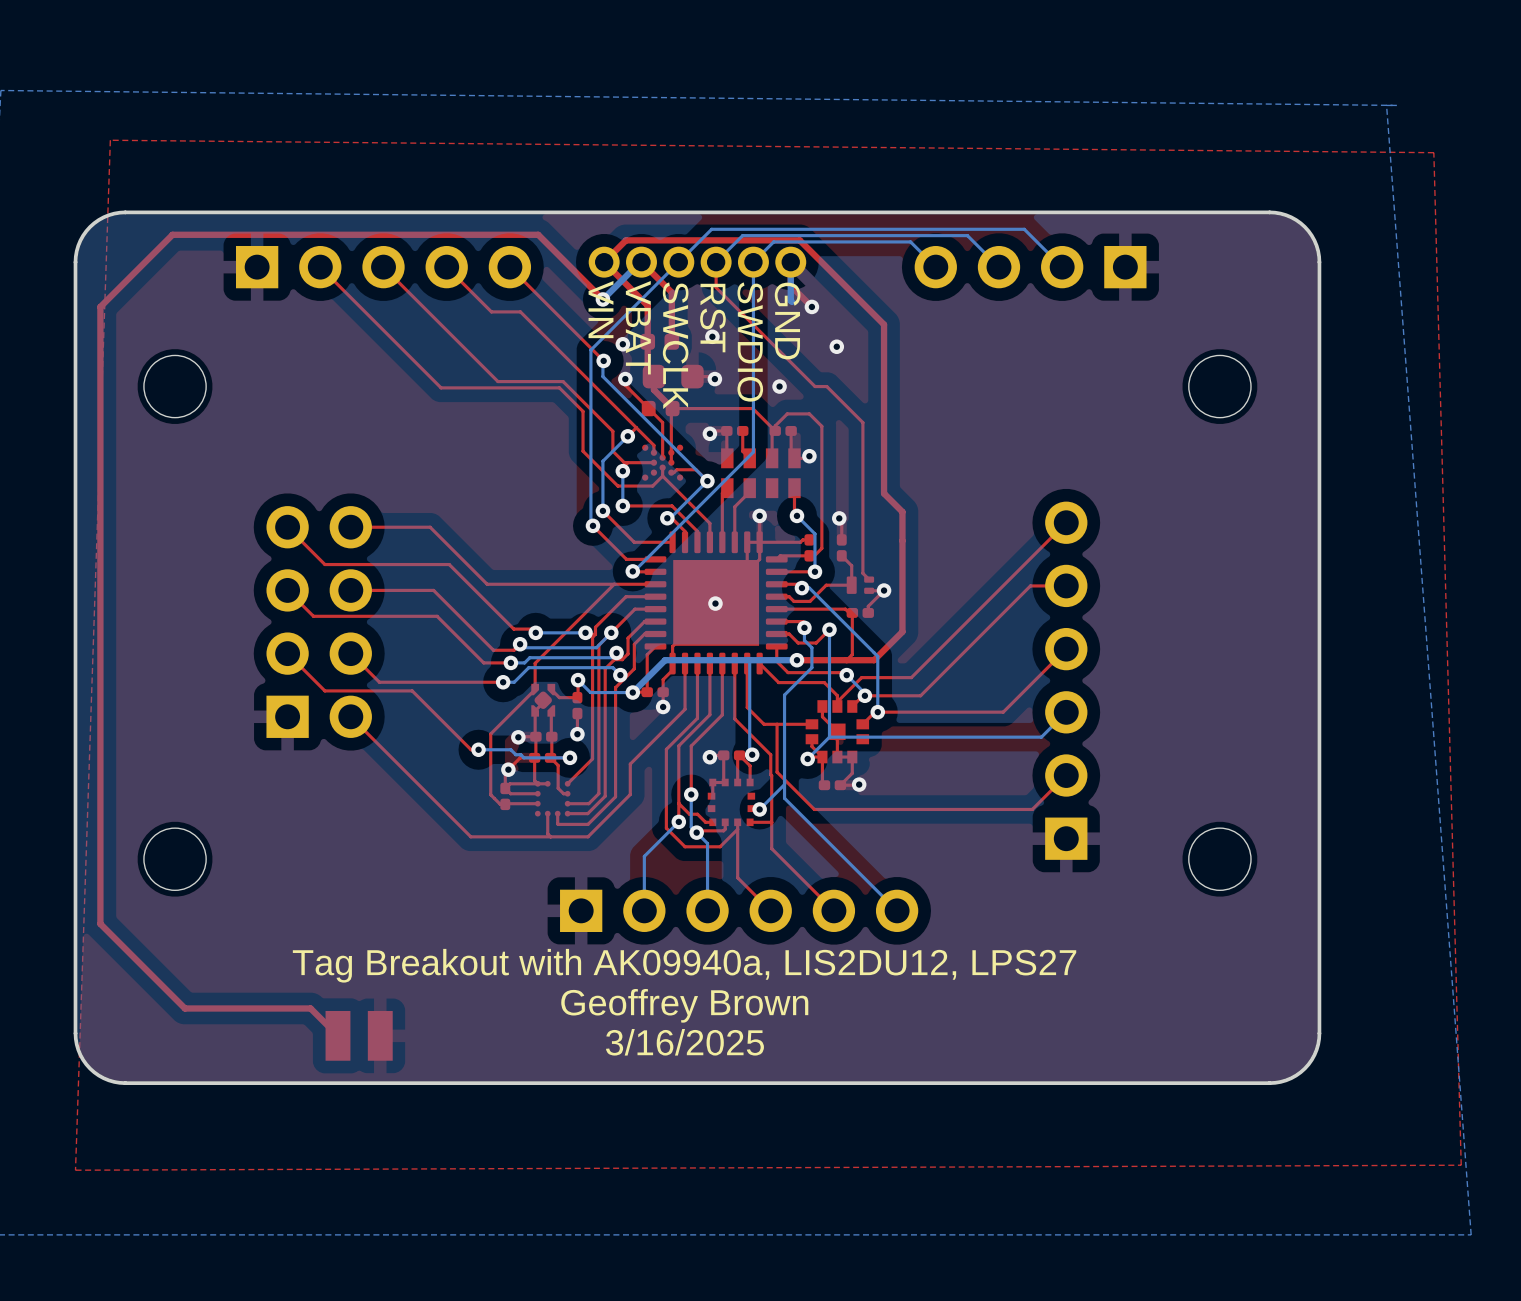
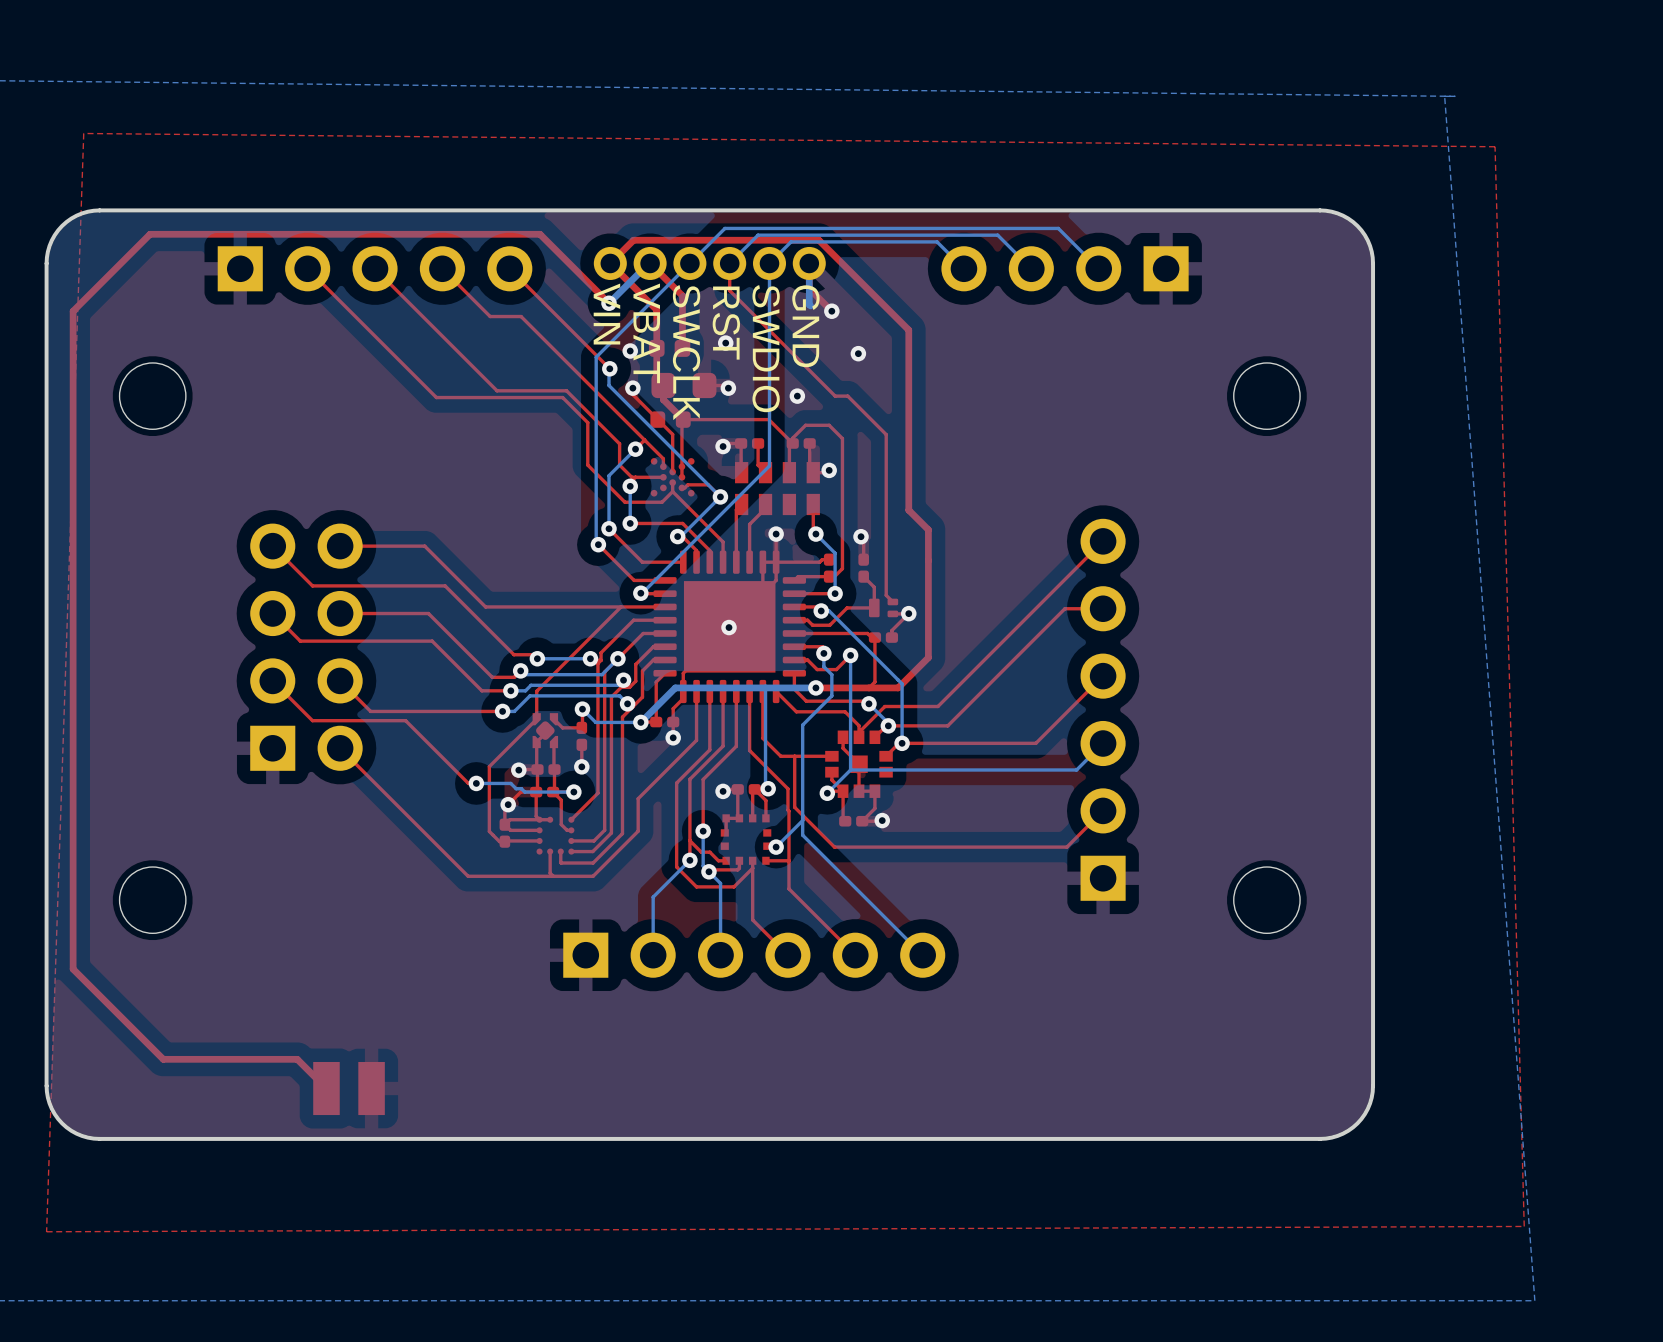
text: Tag Breakout with AK09940a, LIS2DU12, LPS27 (684, 965) -> none
text: Geoffrey Brown (684, 1005) -> none
text: 3/16/2025 (684, 1042) -> none

